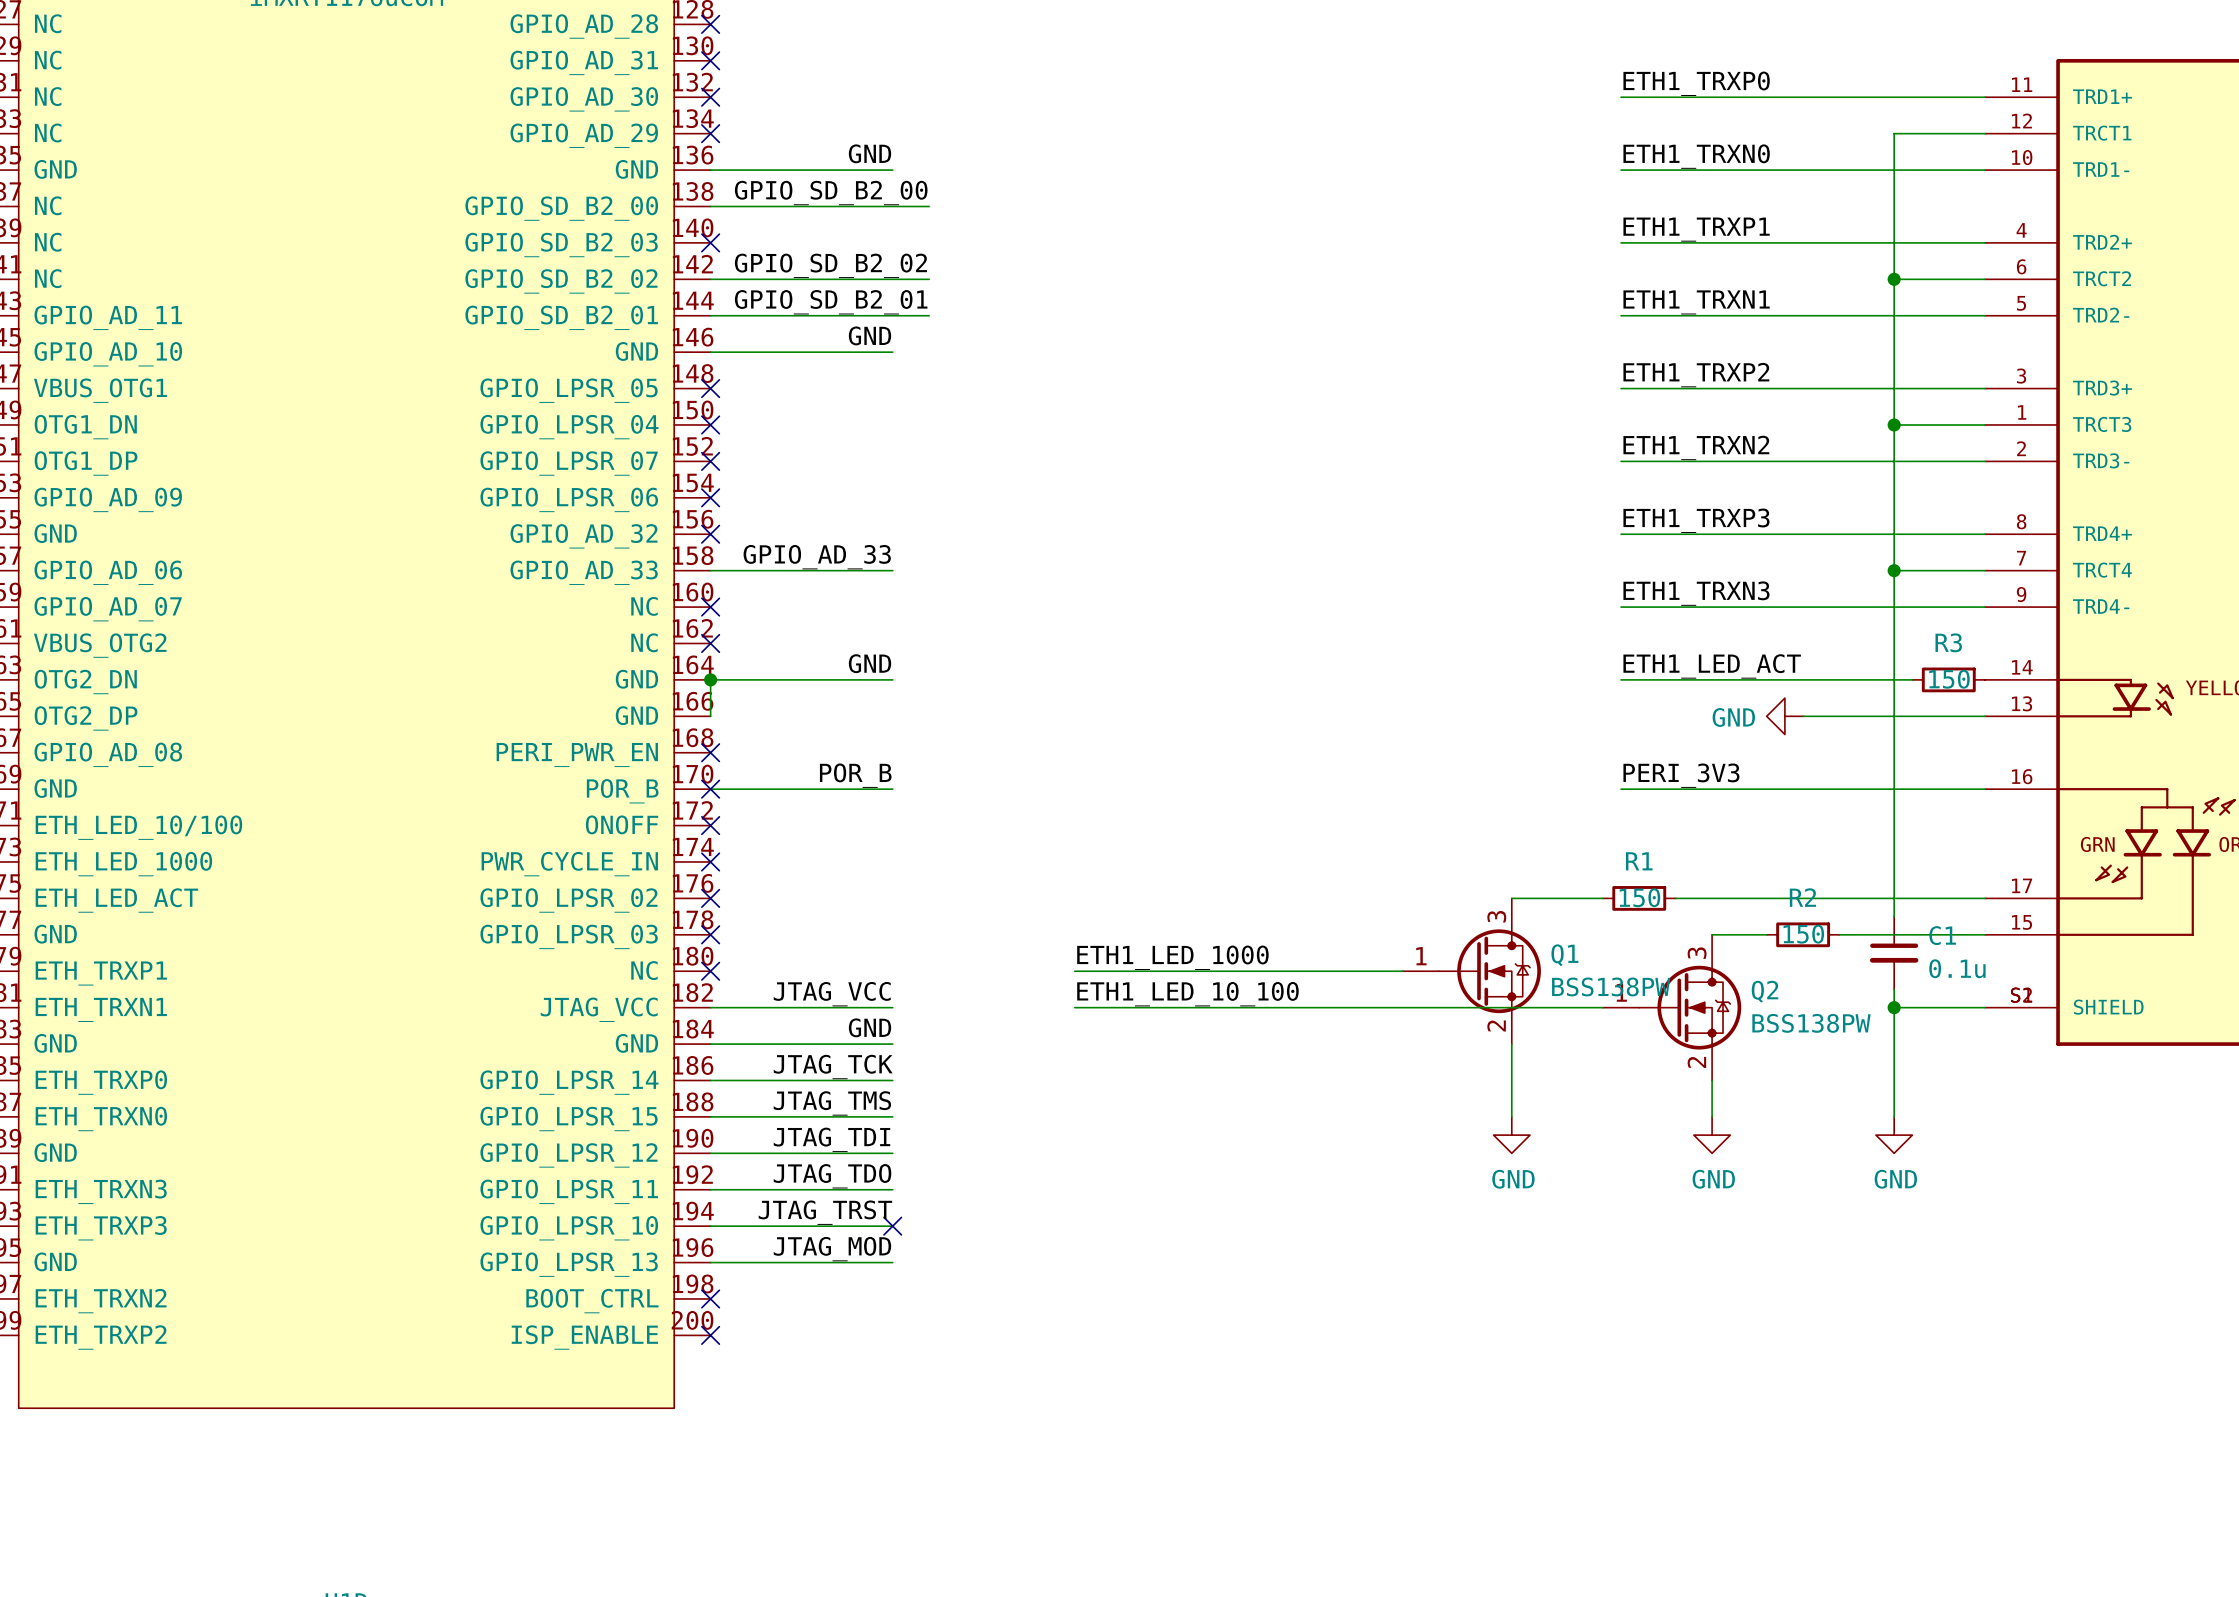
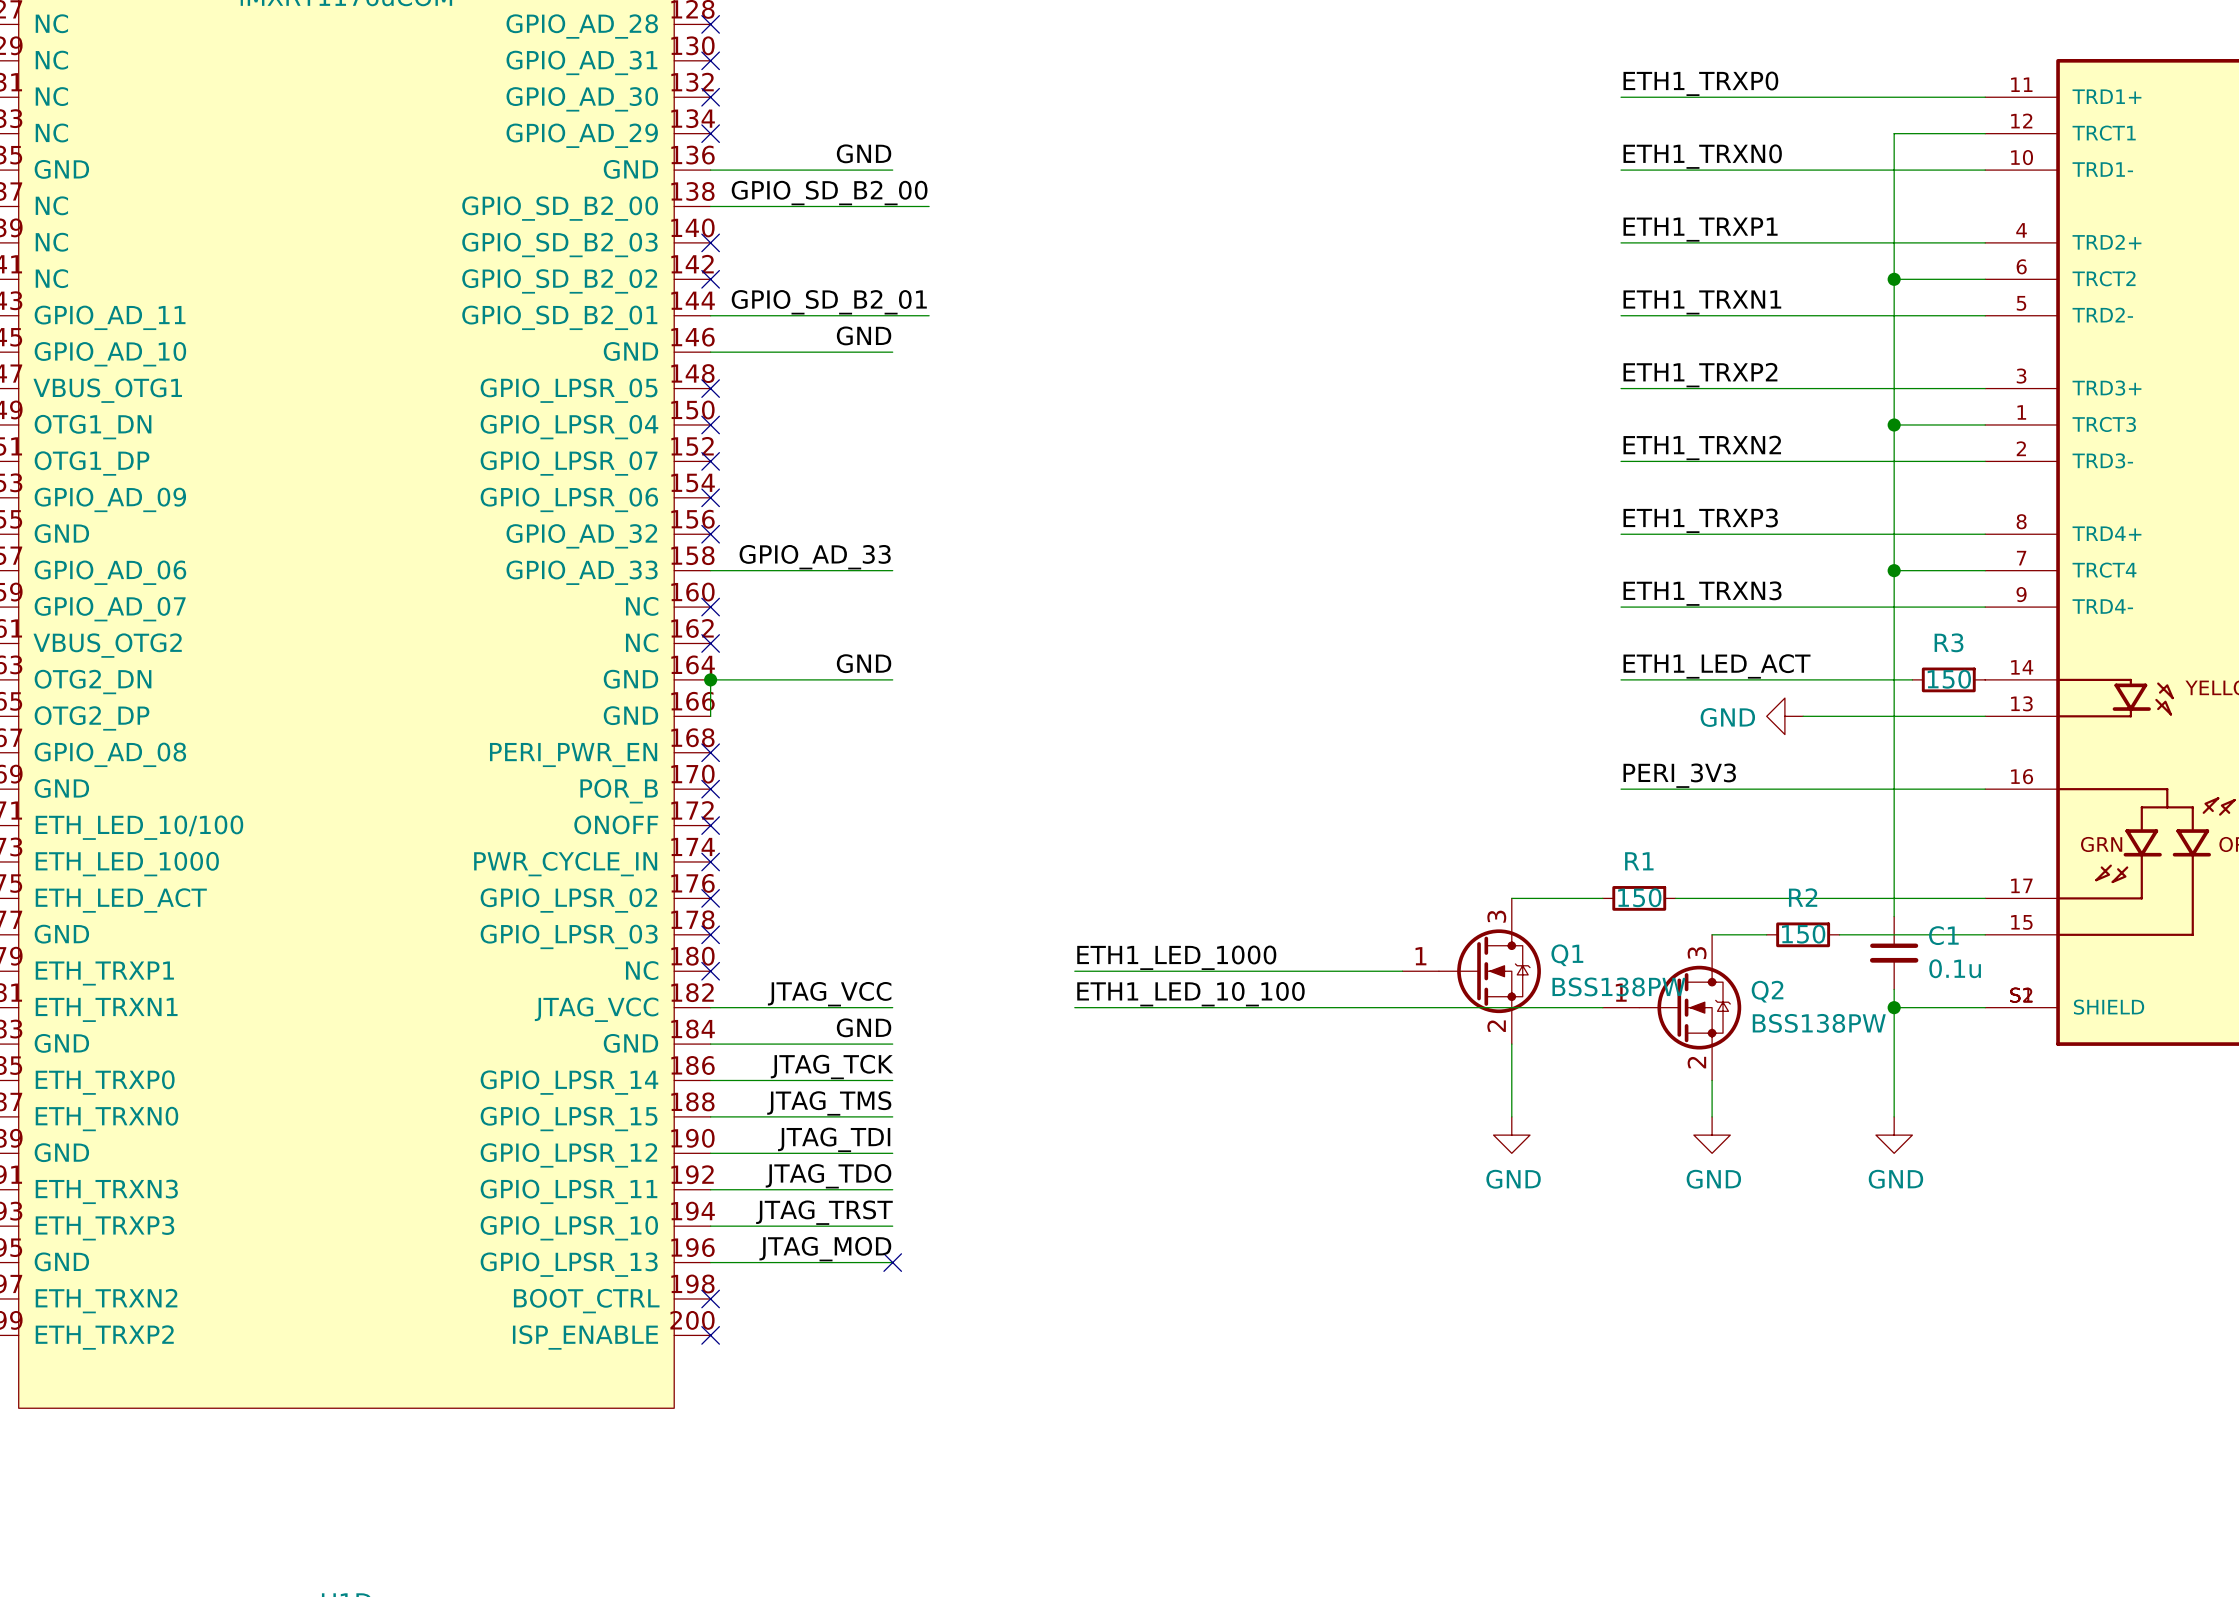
label: GPIO_SD_B2_02 (830, 265) -> none
wire: (710, 279) (929, 279) -> none
no-connect mark: none -> (710, 279)
label: POR_B (855, 775) -> none
wire: (710, 789) (892, 789) -> none
no-connect mark position: (892, 1226) -> (892, 1262)

